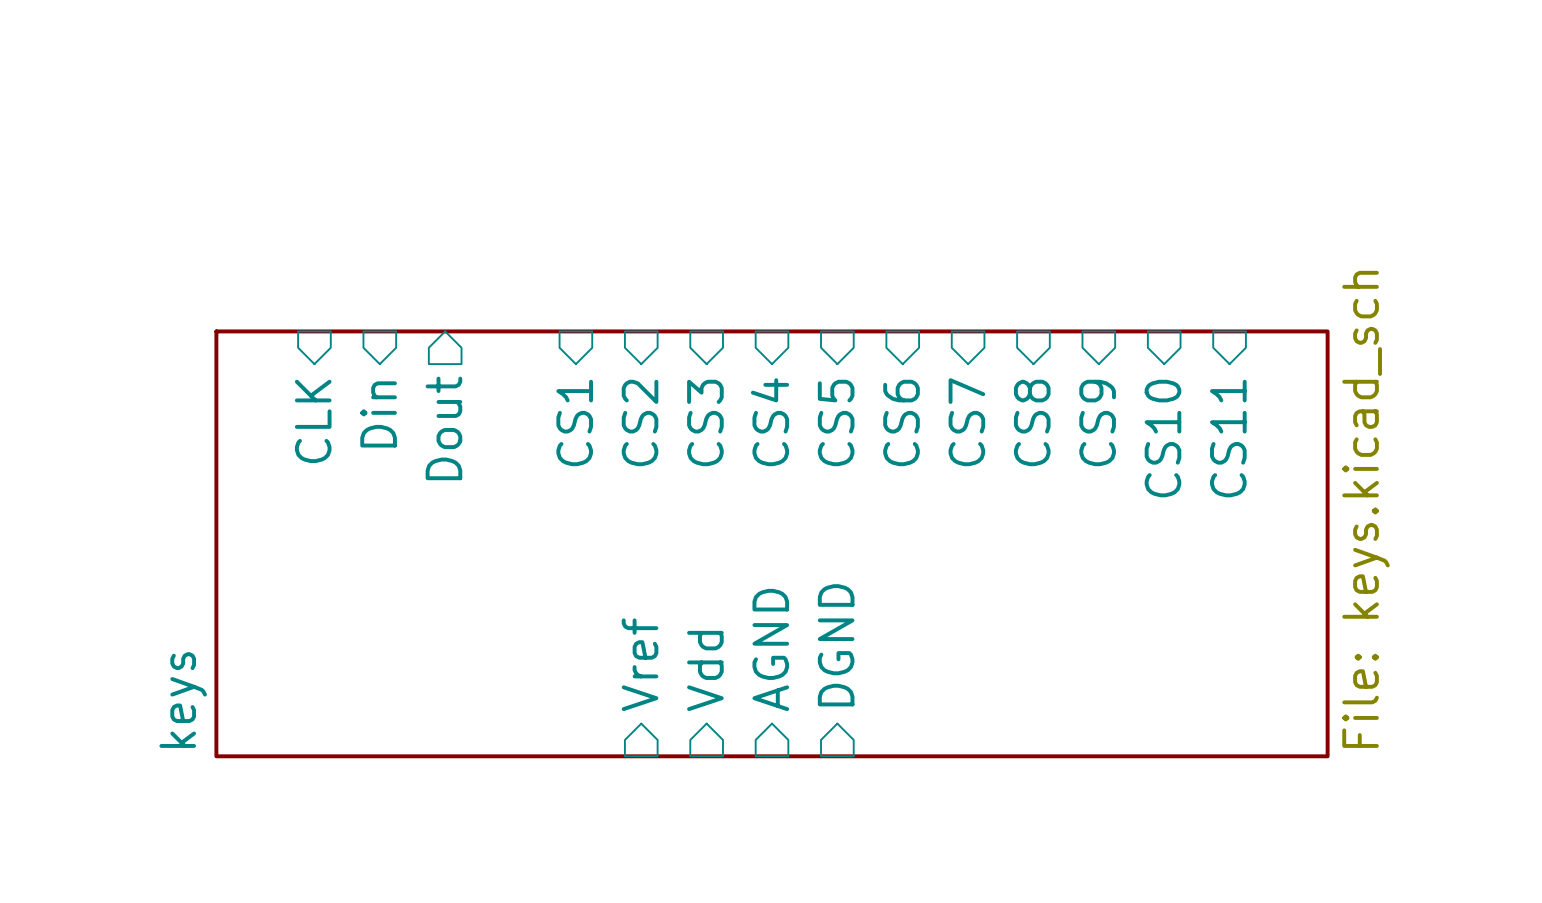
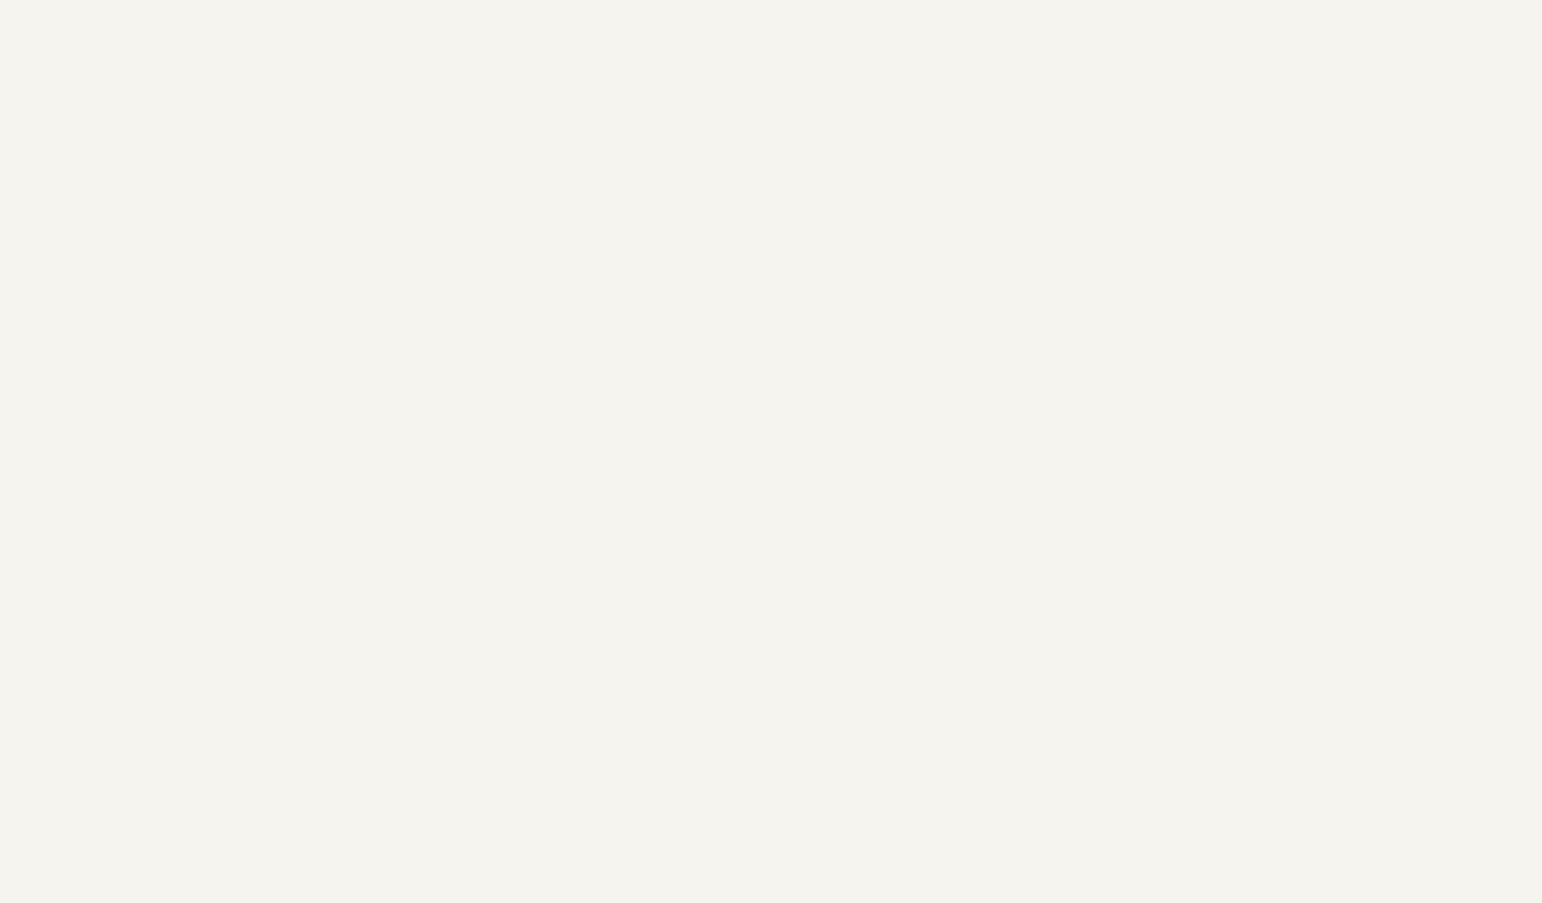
sheet pin: Din (378, 414) -> none
sheet pin: CLK (313, 421) -> none
sheet pin: CS1 (574, 422) -> none
sheet pin: CS2 (640, 422) -> none
sheet pin: CS3 (705, 422) -> none
sheet pin: CS4 (770, 422) -> none
sheet pin: CS5 (836, 422) -> none
sheet pin: CS6 (901, 422) -> none
sheet pin: CS7 (966, 422) -> none
sheet pin: CS8 (1032, 422) -> none
sheet pin: CS9 (1097, 422) -> none
sheet pin: Dout (443, 428) -> none
sheet pin: CS10 (1162, 438) -> none
sheet pin: CS11 (1228, 438) -> none
sheet keys: File: keys.kicad_sch (772, 543) -> none
sheet pin: DGND (836, 645) -> none
sheet pin: AGND (770, 649) -> none
sheet pin: Vref (640, 664) -> none
sheet pin: Vdd (705, 670) -> none

